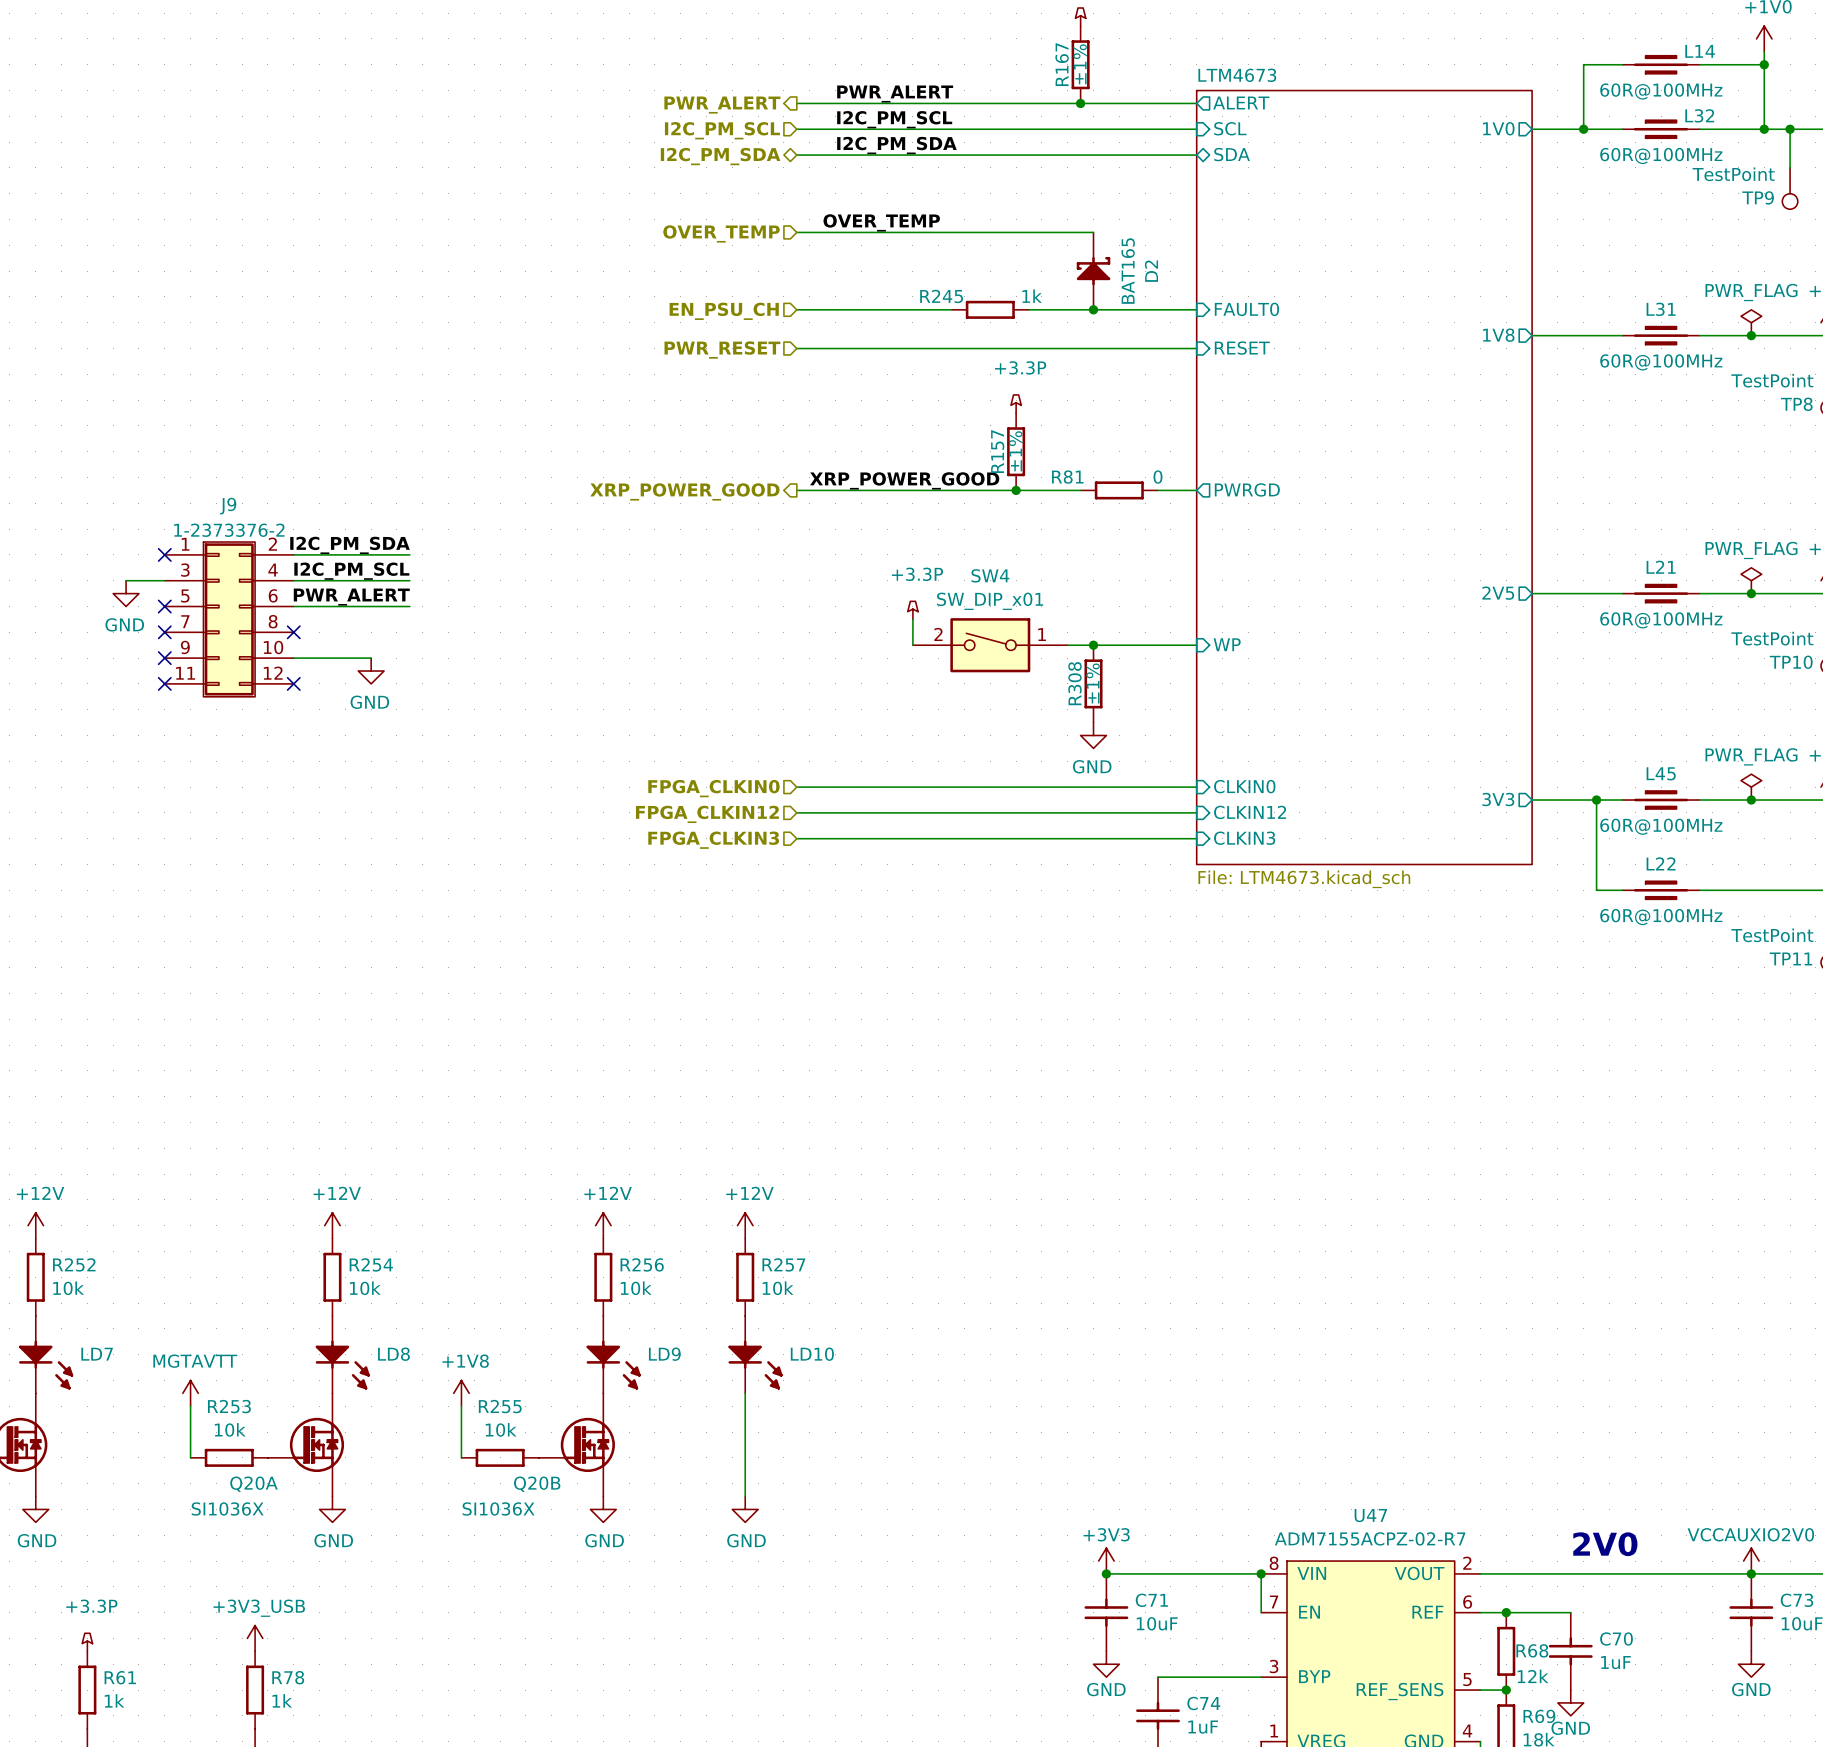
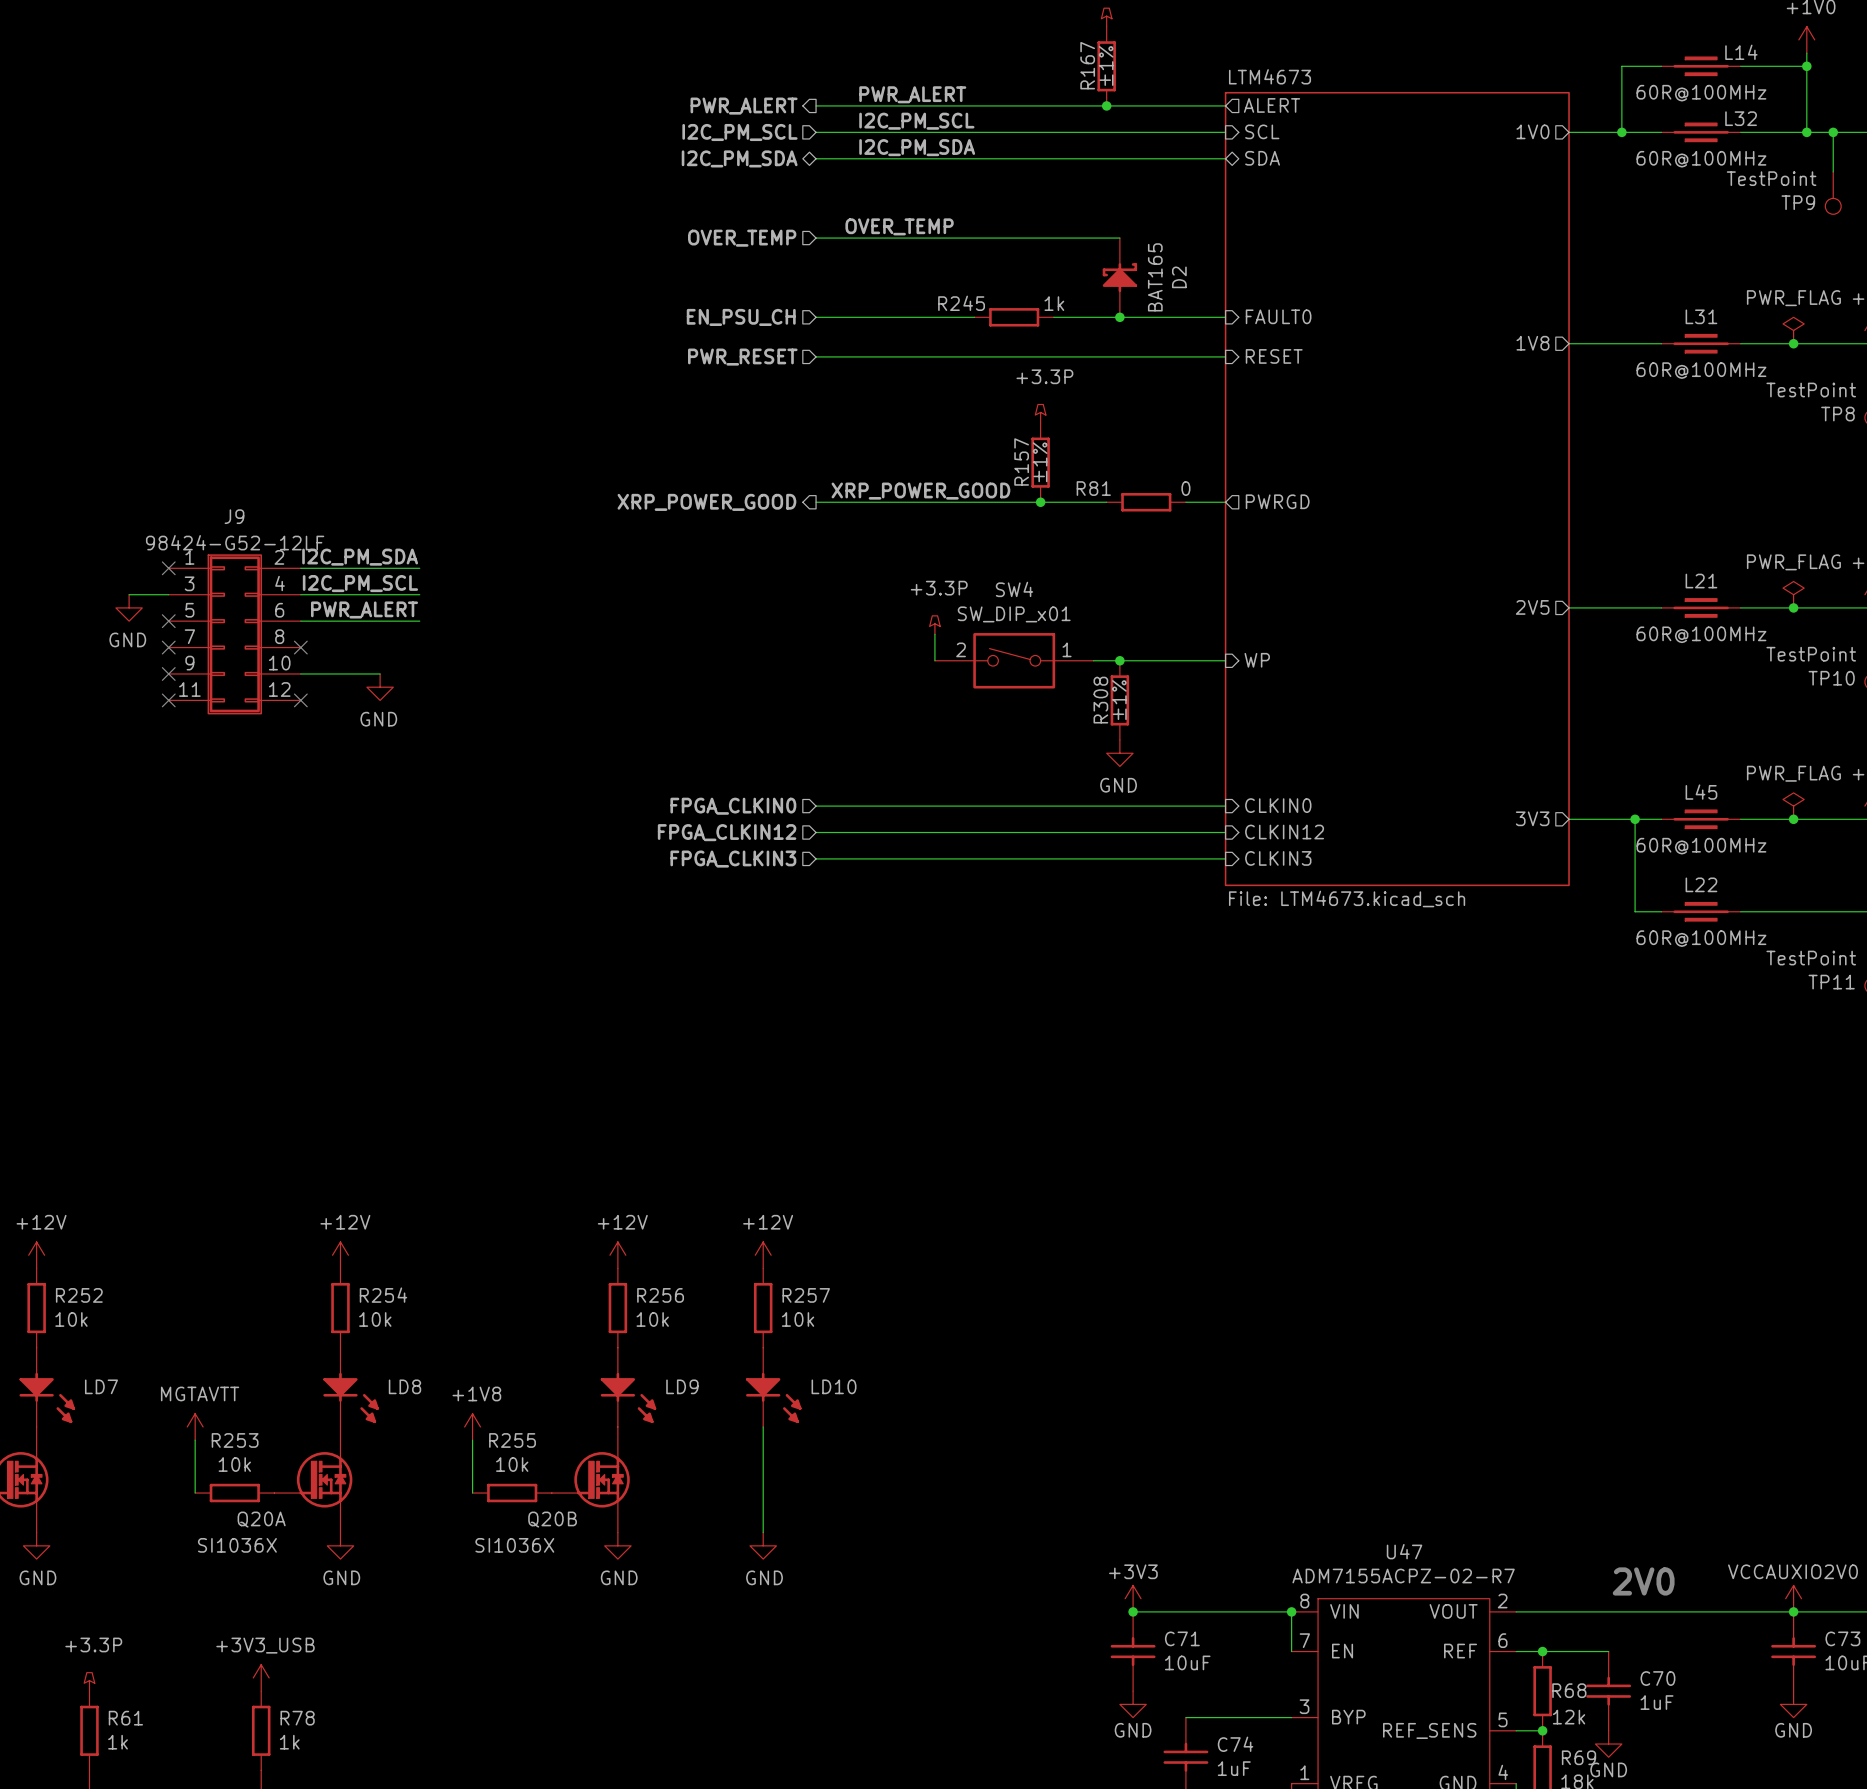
J9 value: 1-2373376-2 (229, 530) -> 98424-G52-12LF (235, 542)

